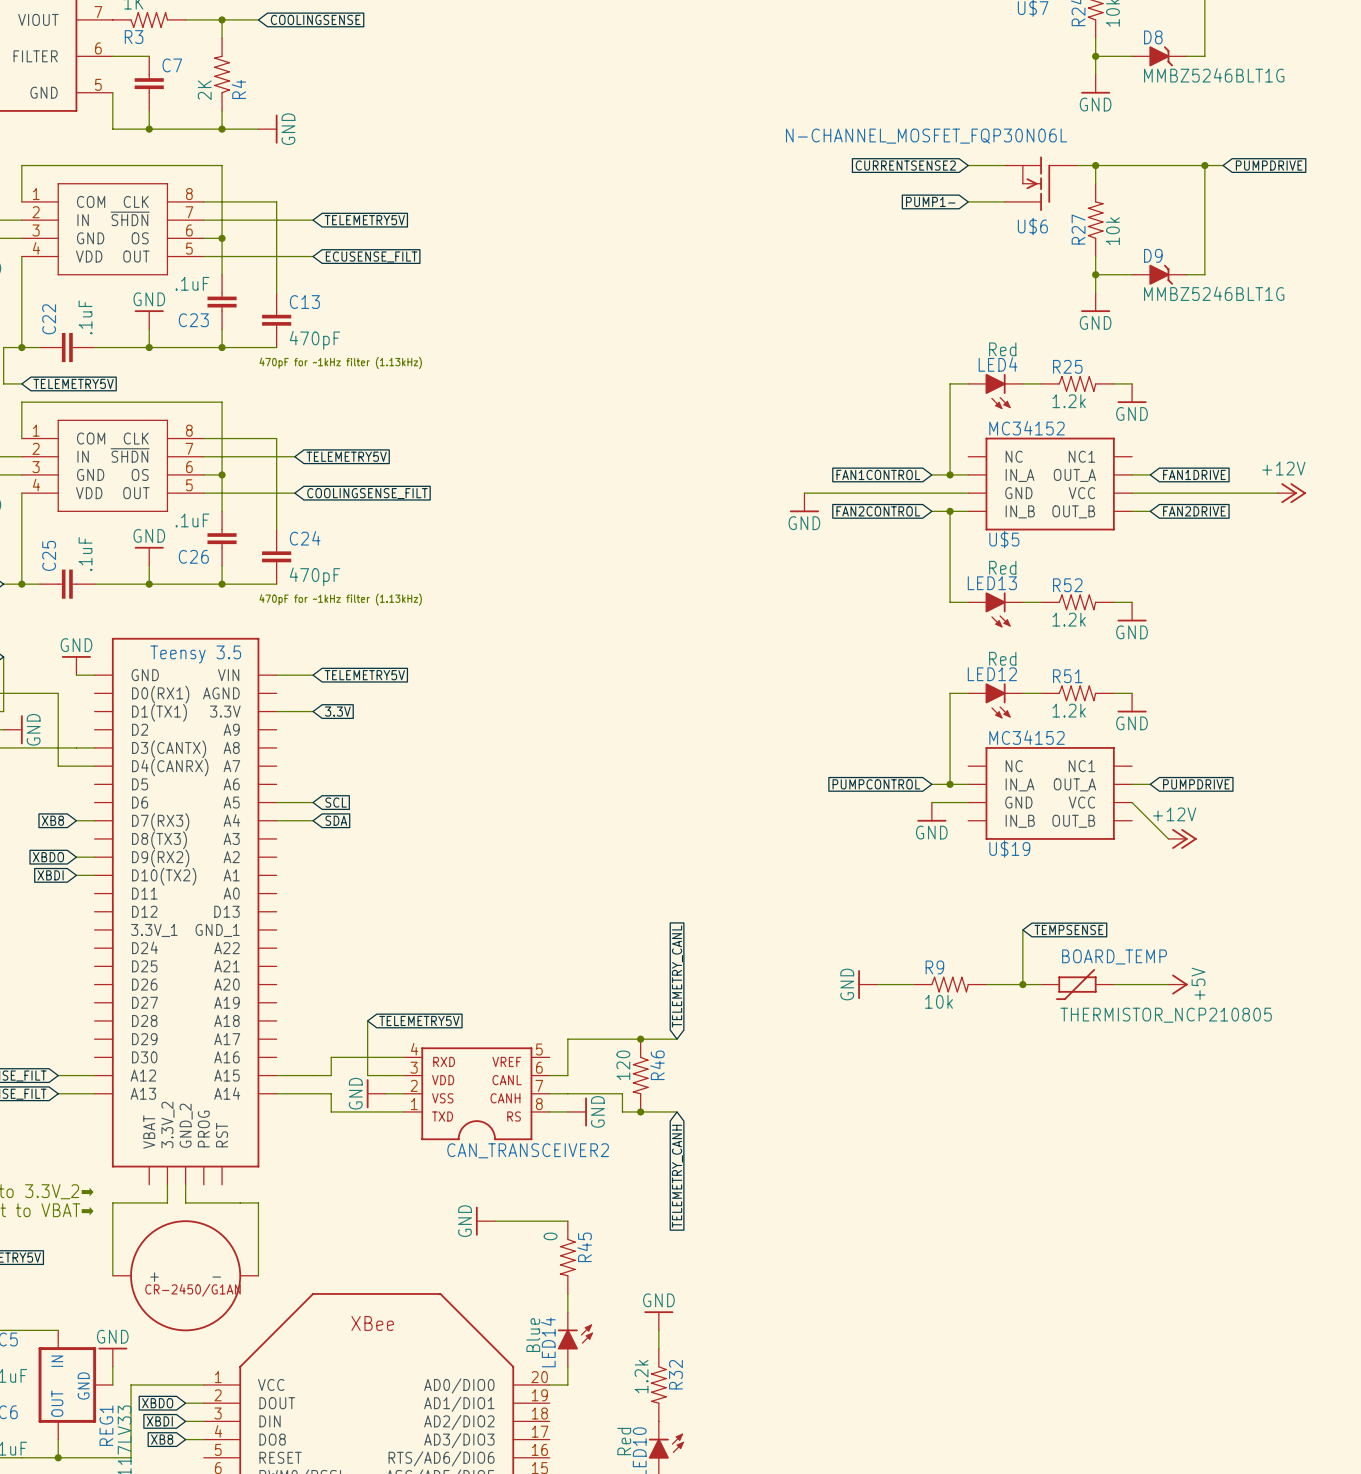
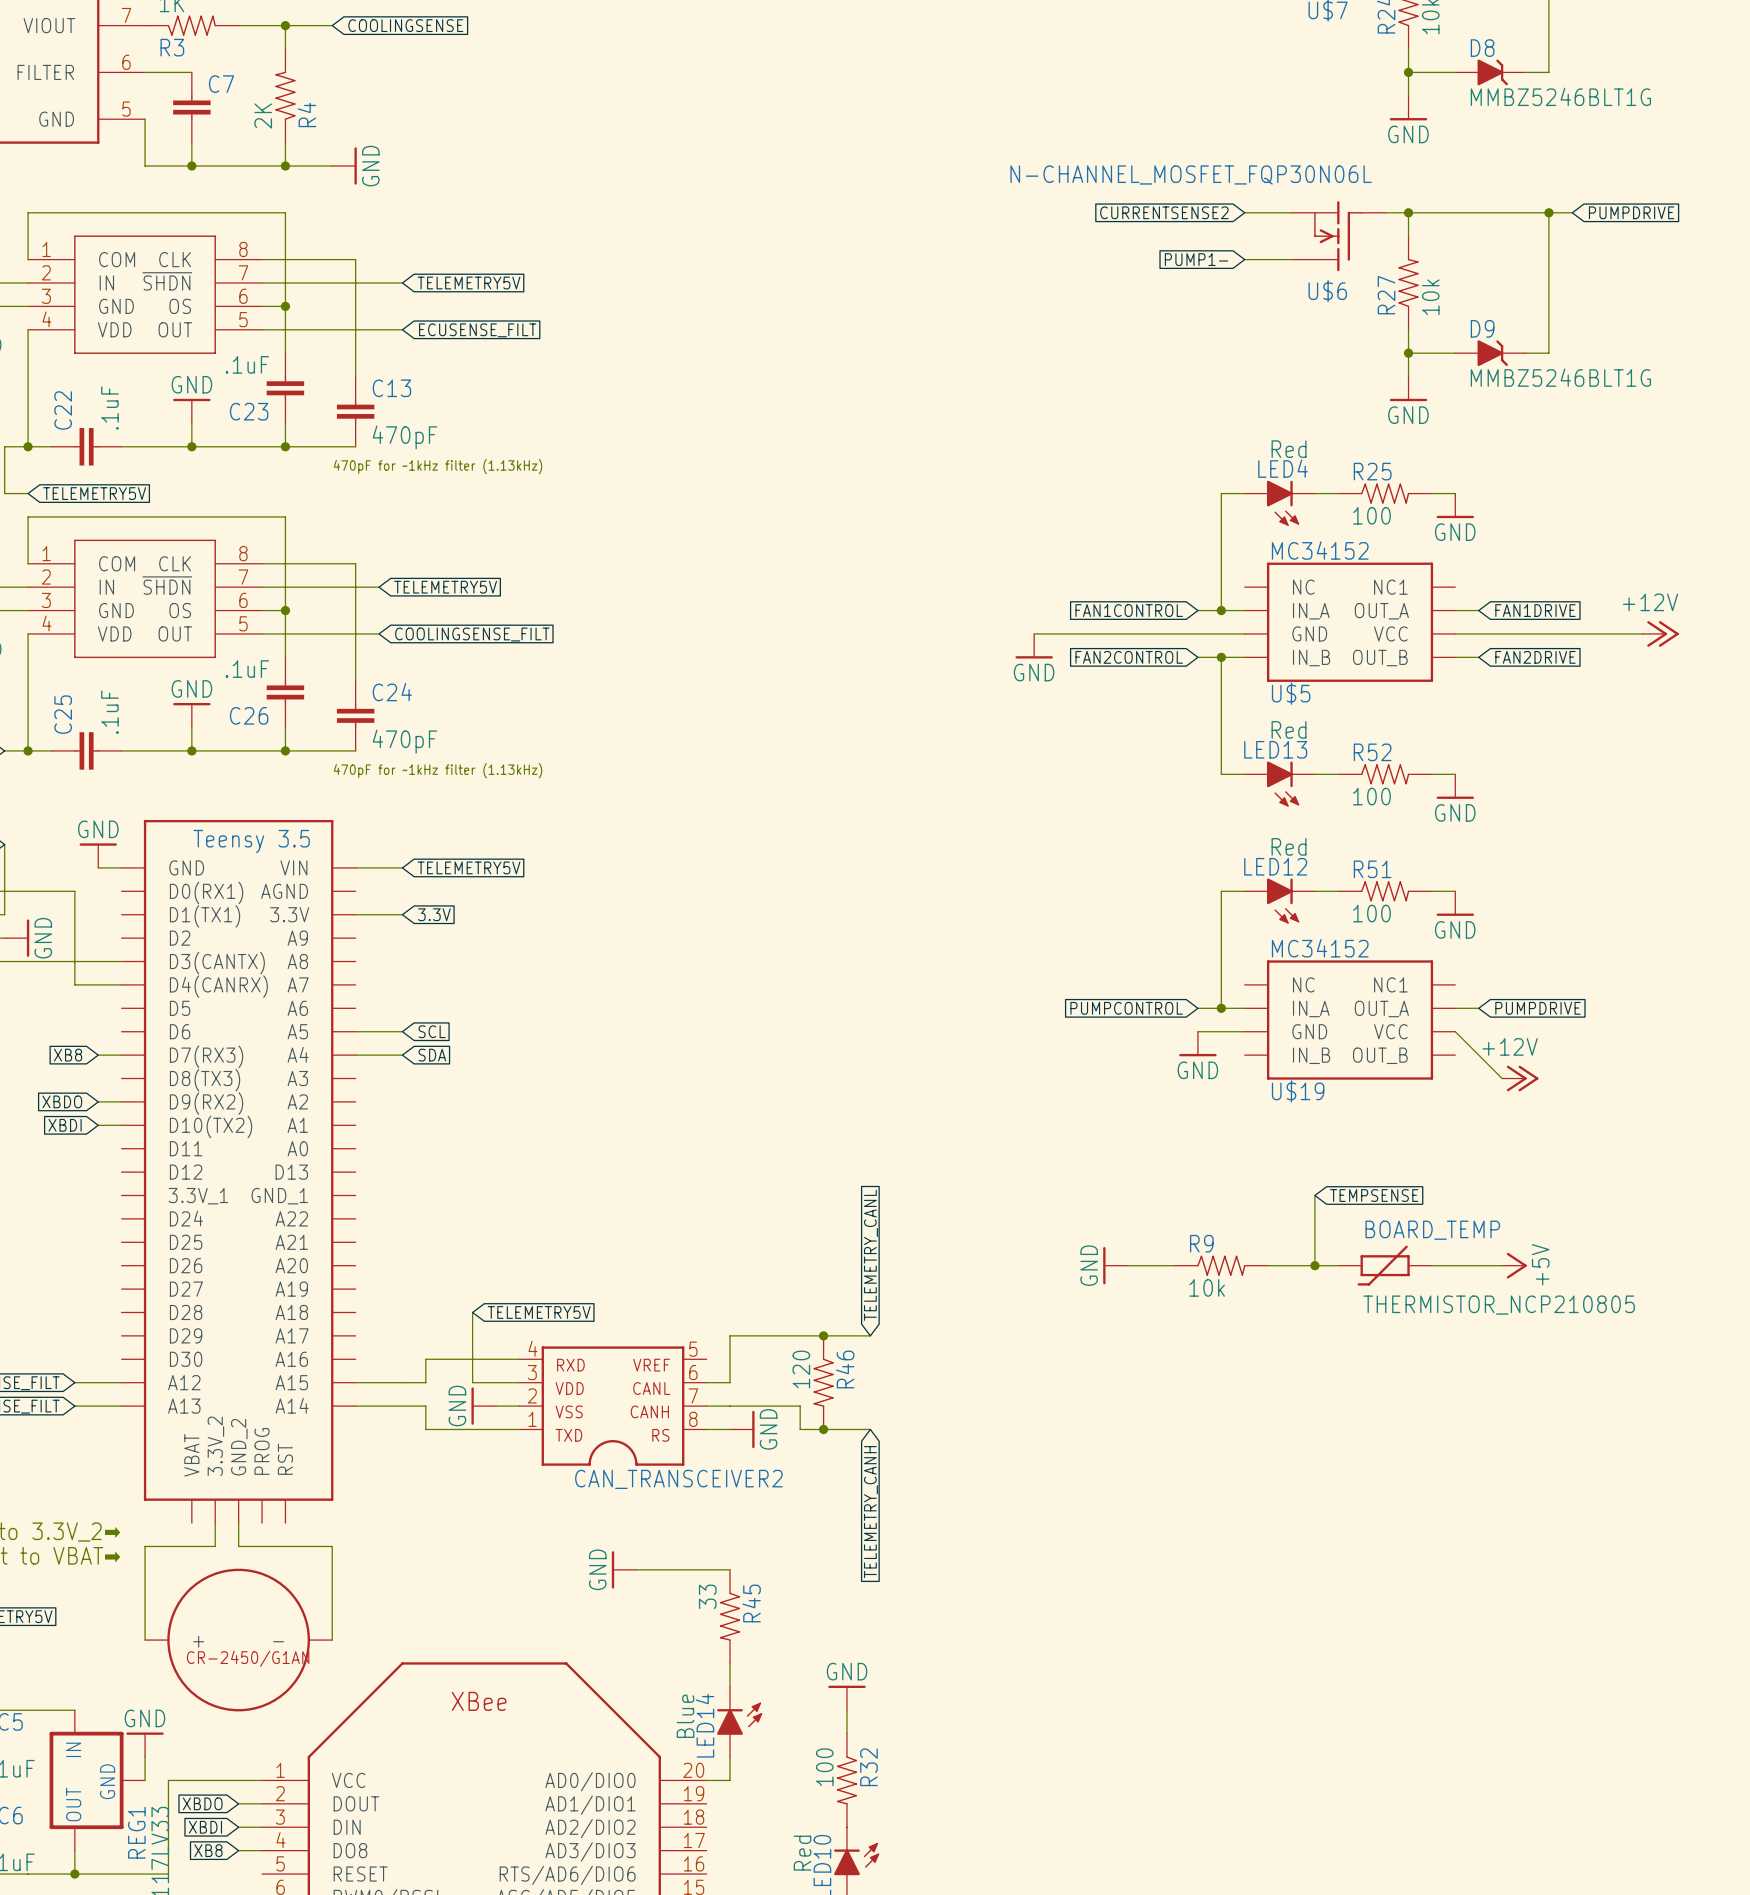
R25 value: 1.2k (1069, 401) -> 100 (1371, 515)
R52 value: 1.2k (1069, 619) -> 100 (1371, 796)
R51 value: 1.2k (1069, 710) -> 100 (1371, 913)
R45 value: 0 (550, 1236) -> 33 (707, 1596)
R32 value: 1.2k (641, 1376) -> 100 (824, 1767)

